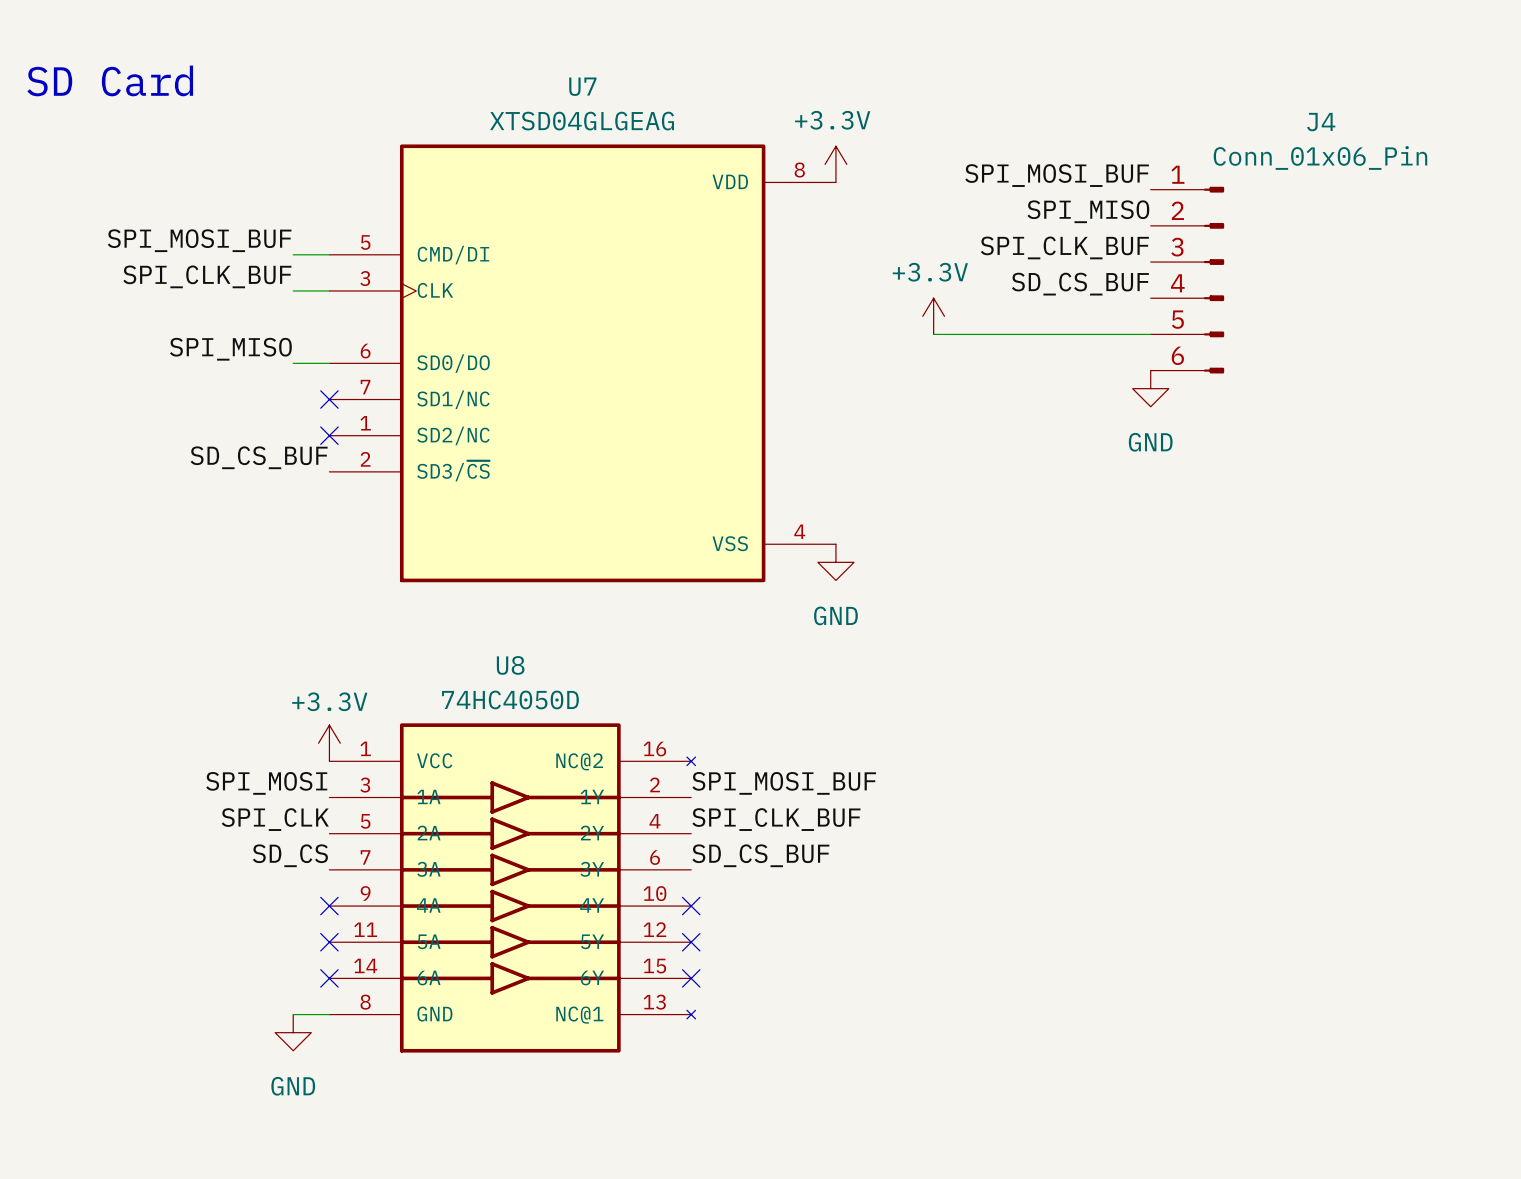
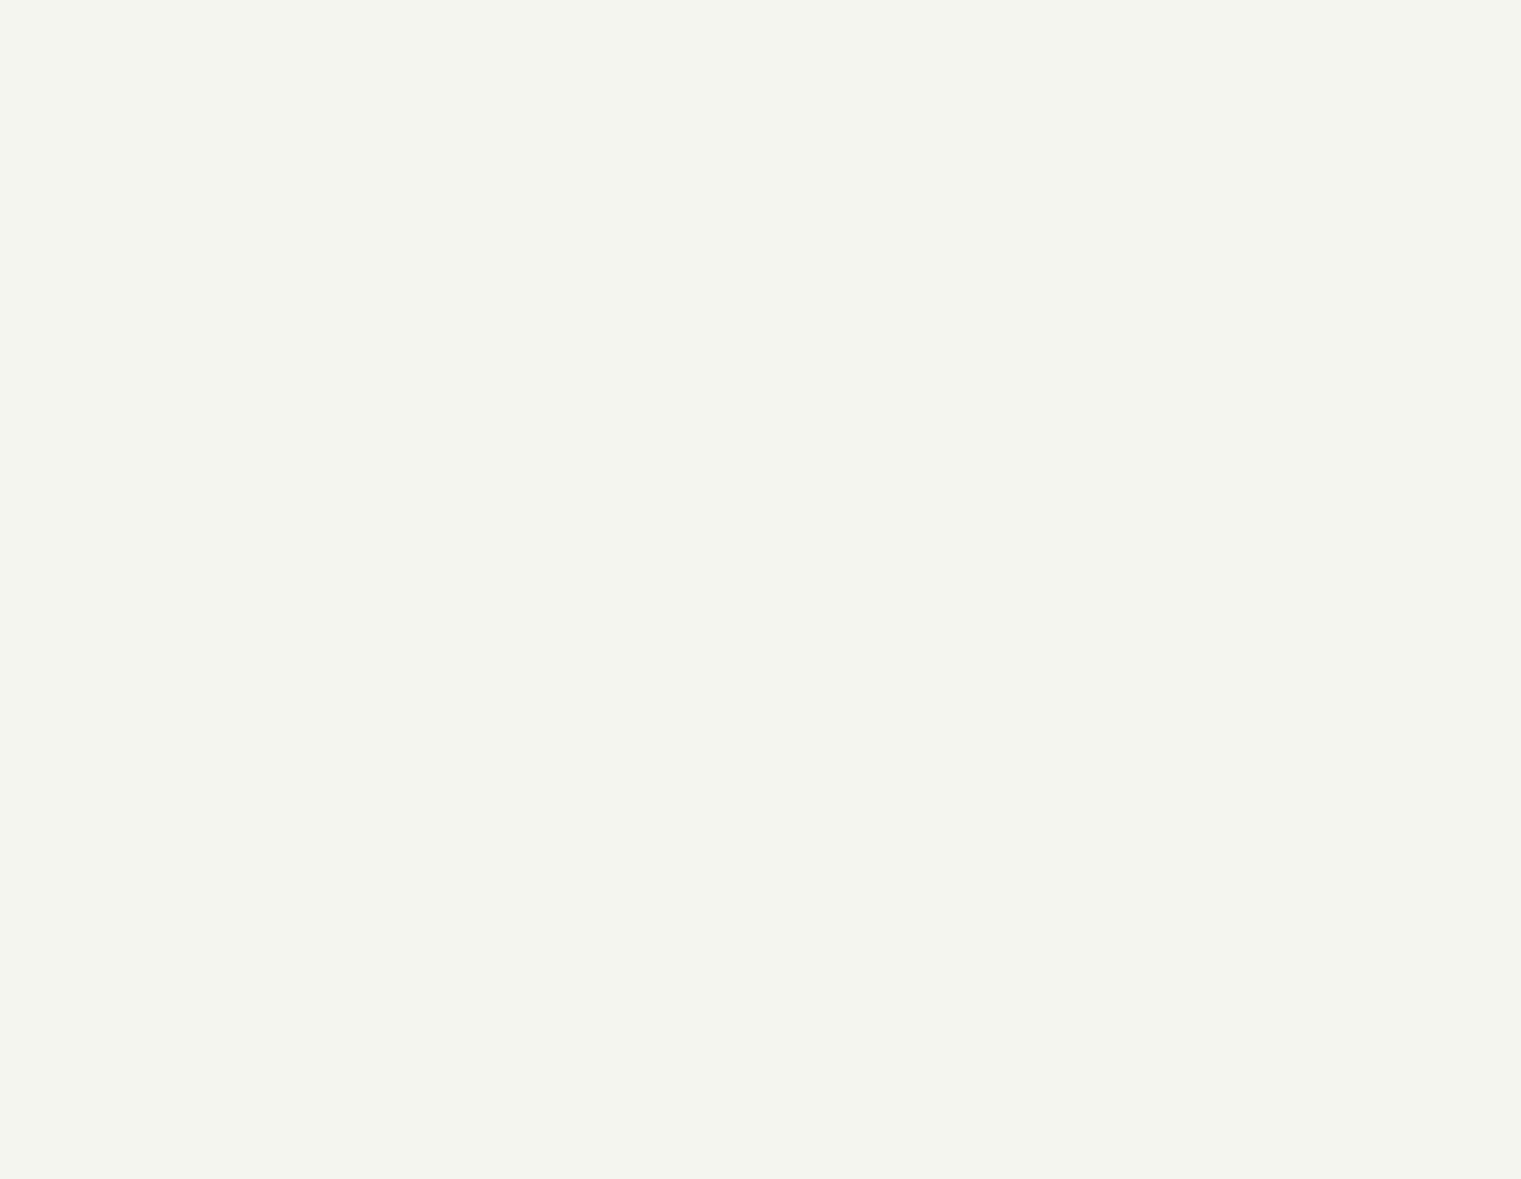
text: SD Card (110, 80) -> none
power symbol: +3.3V (835, 164) -> none
label: SPI_MOSI_BUF (1057, 175) -> none
label: SPI_MISO (1088, 211) -> none
label: SPI_MOSI_BUF (199, 240) -> none
label: SPI_CLK_BUF (1064, 247) -> none
wire: (293, 254) (329, 254) -> none
label: SPI_CLK_BUF (207, 276) -> none
J4: Conn_01x06_Pin (1187, 280) -> none
label: SD_CS_BUF (1080, 284) -> none
wire: (293, 290) (329, 290) -> none
power symbol: +3.3V (933, 316) -> none
wire: (933, 334) (1150, 334) -> none
label: SPI_MISO (230, 349) -> none
wire: (293, 363) (329, 363) -> none
U7: XTSD04GLGEAG (582, 363) -> none
power symbol: GND (1150, 388) -> none
no-connect mark: (329, 399) -> none
no-connect mark: (329, 435) -> none
label: SD_CS_BUF (259, 457) -> none
power symbol: GND (835, 562) -> none
power symbol: +3.3V (329, 743) -> none
label: SPI_MOSI (266, 783) -> none
label: SPI_MOSI_BUF (784, 783) -> none
label: SPI_CLK (275, 819) -> none
label: SPI_CLK_BUF (776, 819) -> none
label: SD_CS (290, 855) -> none
label: SD_CS_BUF (760, 855) -> none
U8: 74HC4050D (512, 887) -> none
no-connect mark: (329, 906) -> none
no-connect mark: (691, 906) -> none
no-connect mark: (329, 942) -> none
no-connect mark: (691, 942) -> none
no-connect mark: (329, 978) -> none
no-connect mark: (691, 978) -> none
wire: (293, 1014) (329, 1014) -> none
power symbol: GND (293, 1032) -> none

